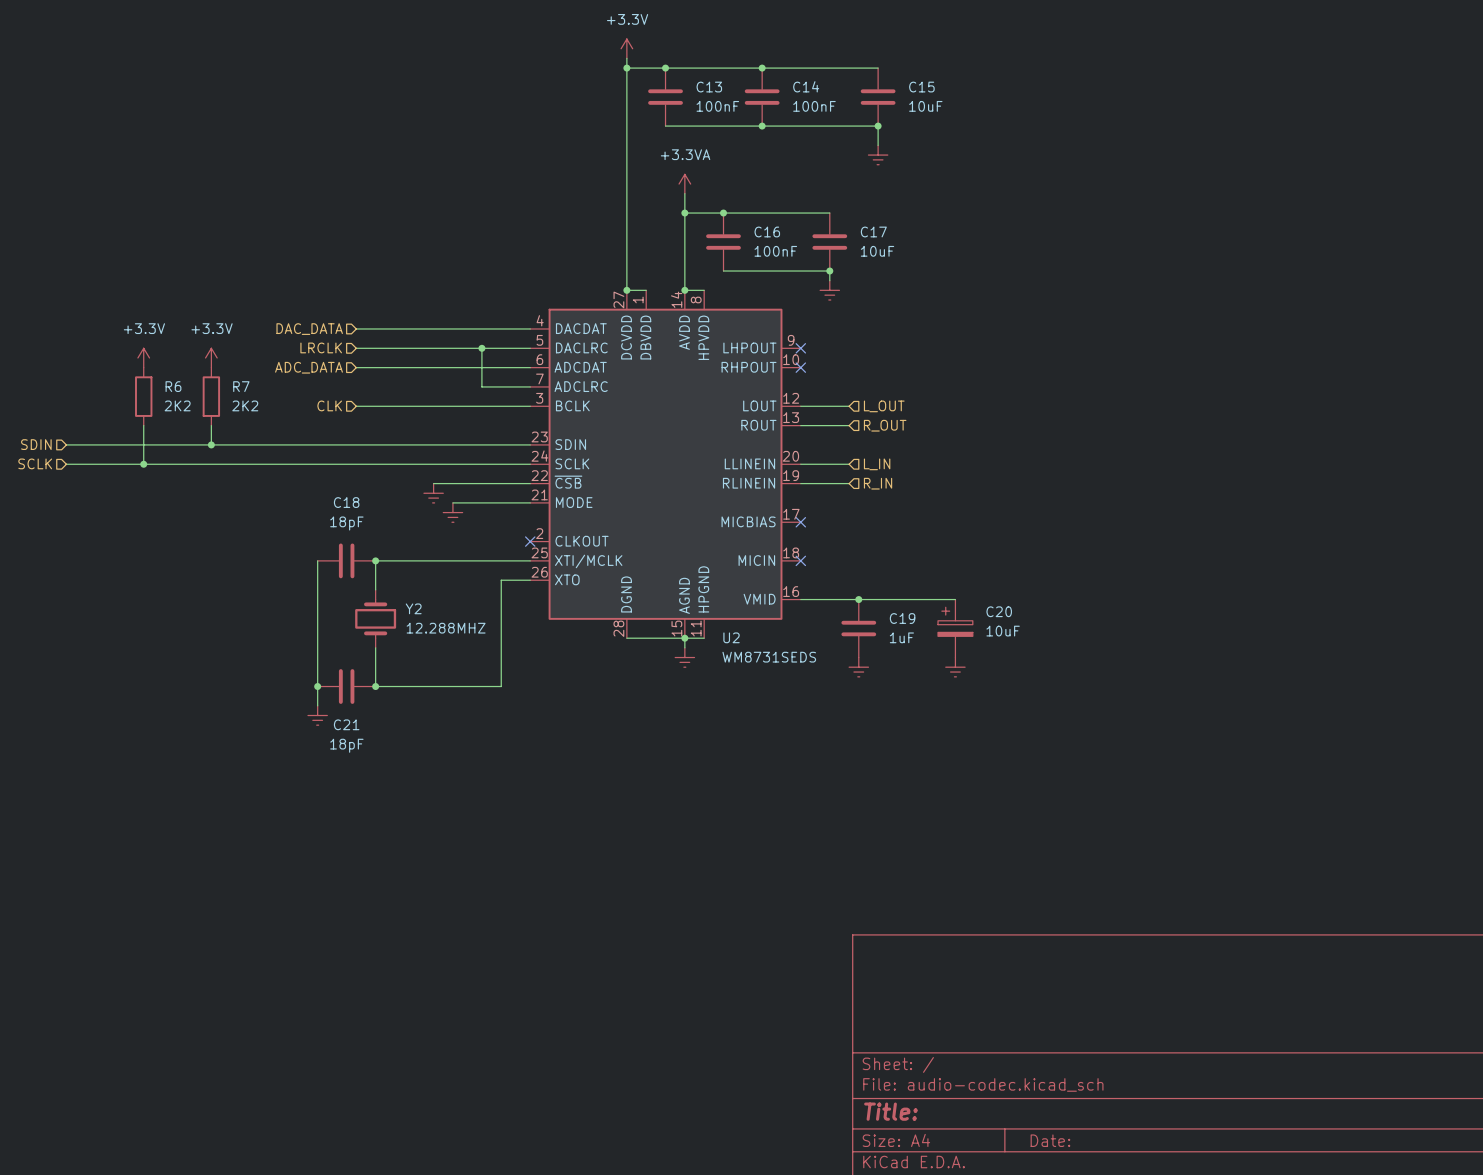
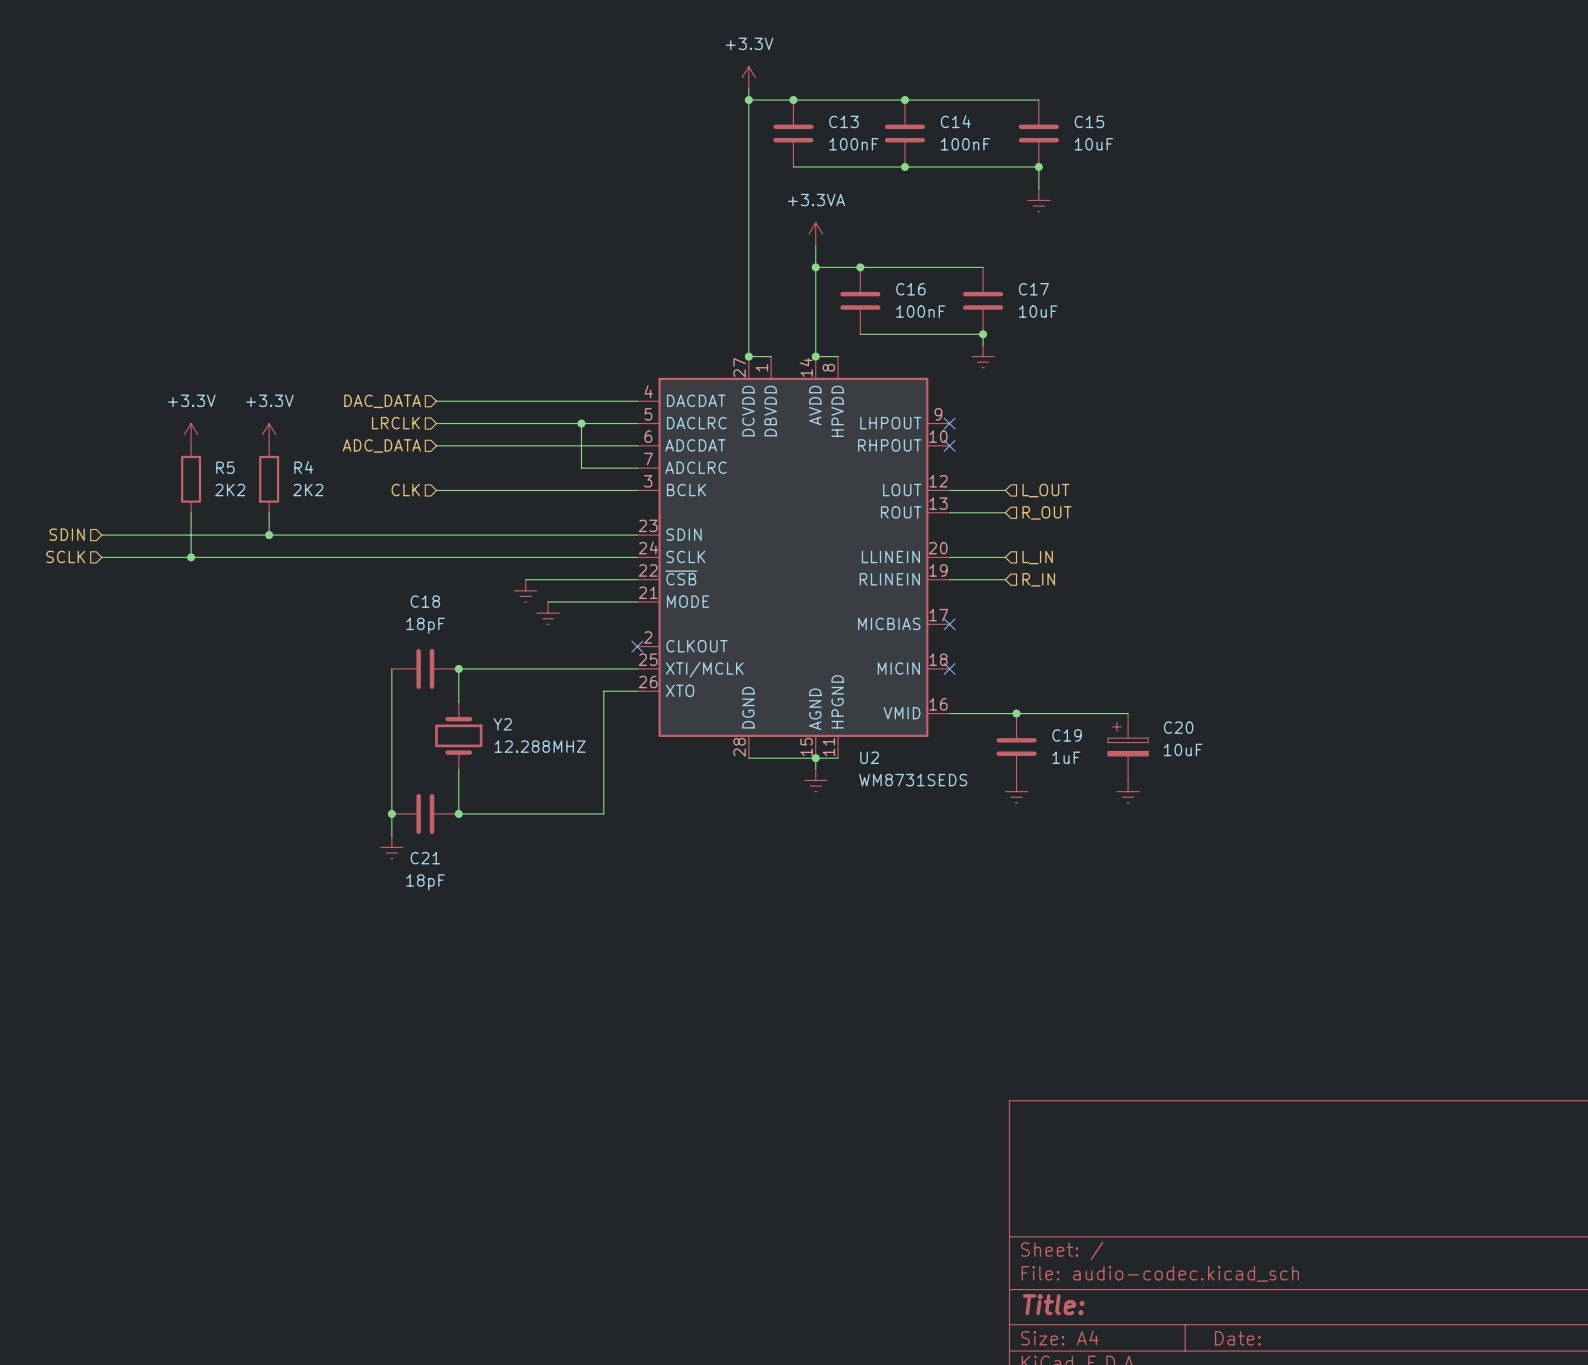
R6 name: R6 (173, 386) -> R5 (225, 467)
R7 name: R7 (241, 386) -> R4 (303, 467)

